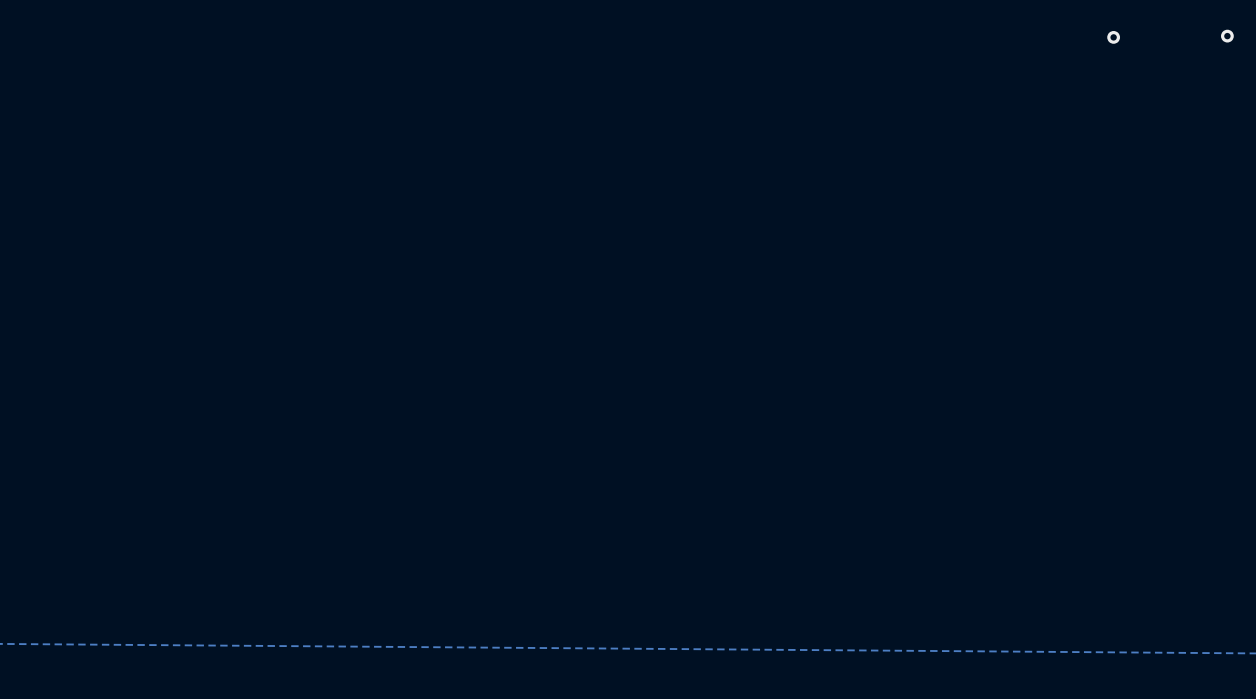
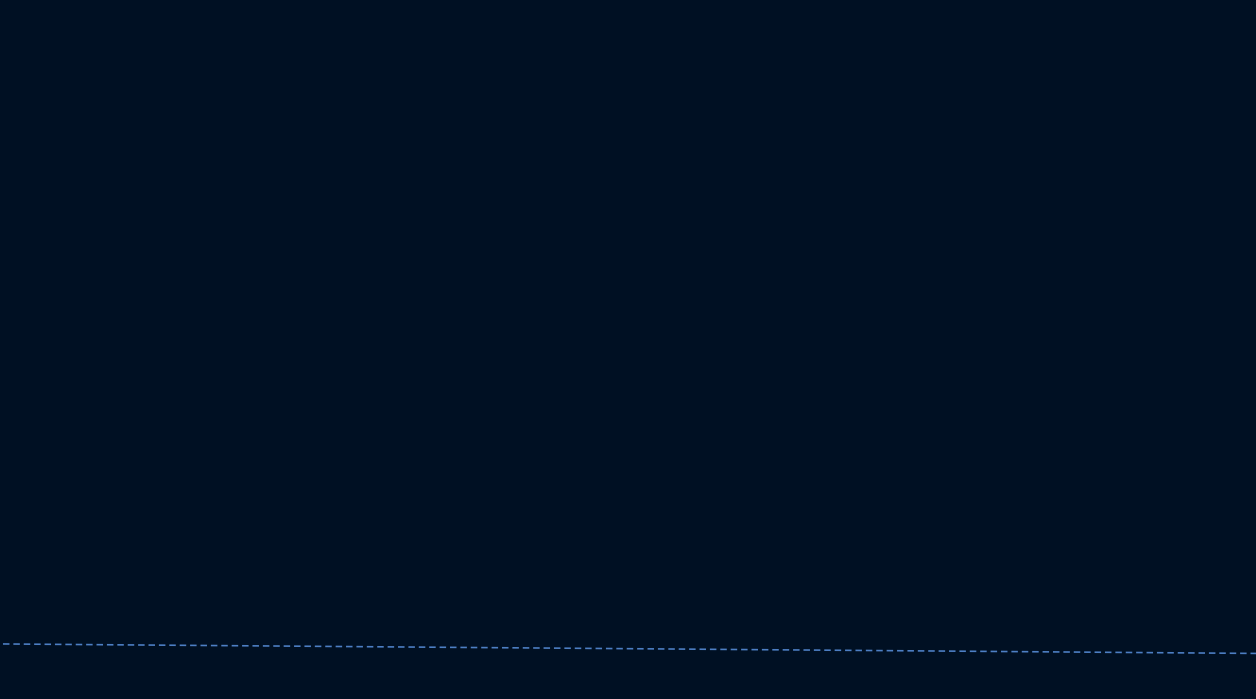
via: (1227, 36) -> none
via: (1113, 37) -> none

